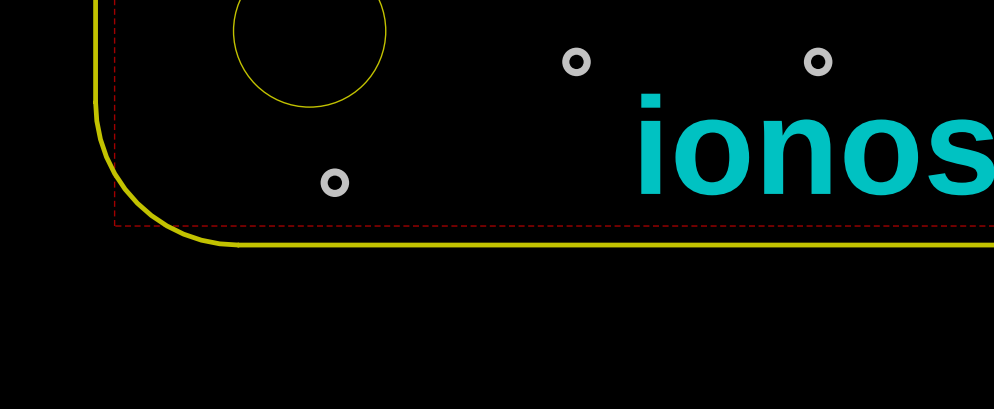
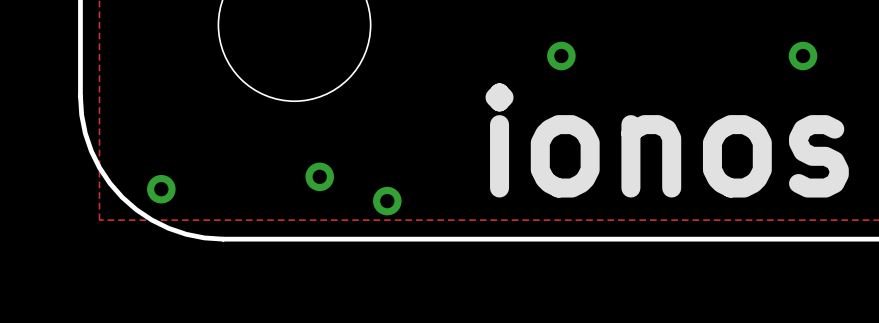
via: none -> (161, 189)
via: none -> (387, 201)

